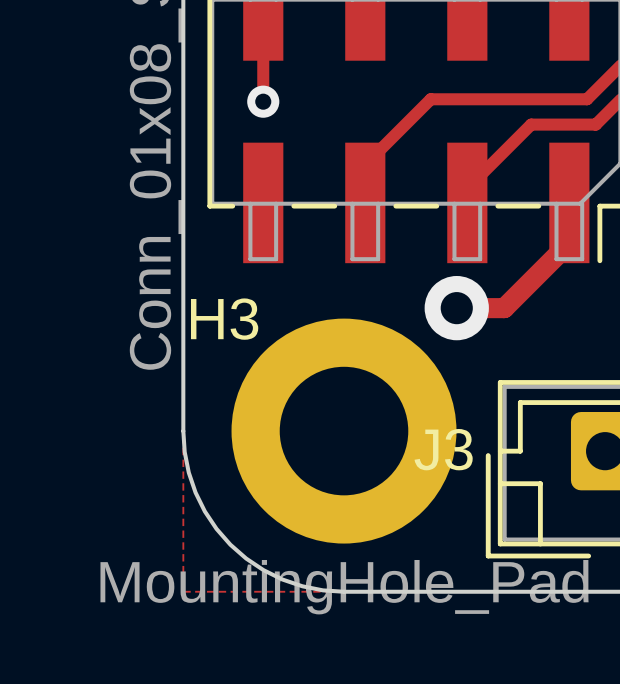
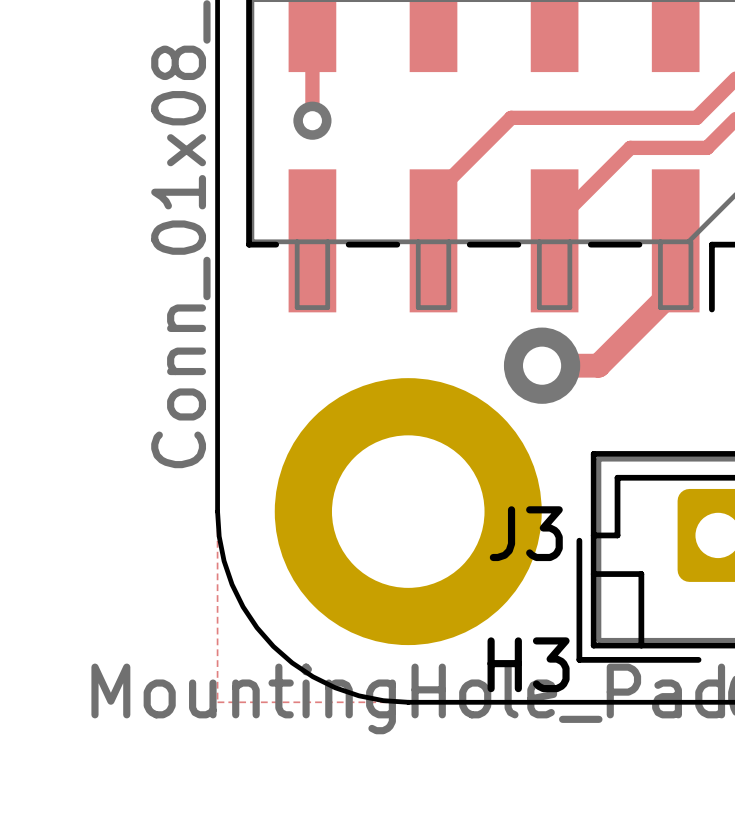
H3 name position: H3 (224, 319) -> H3 (528, 664)

